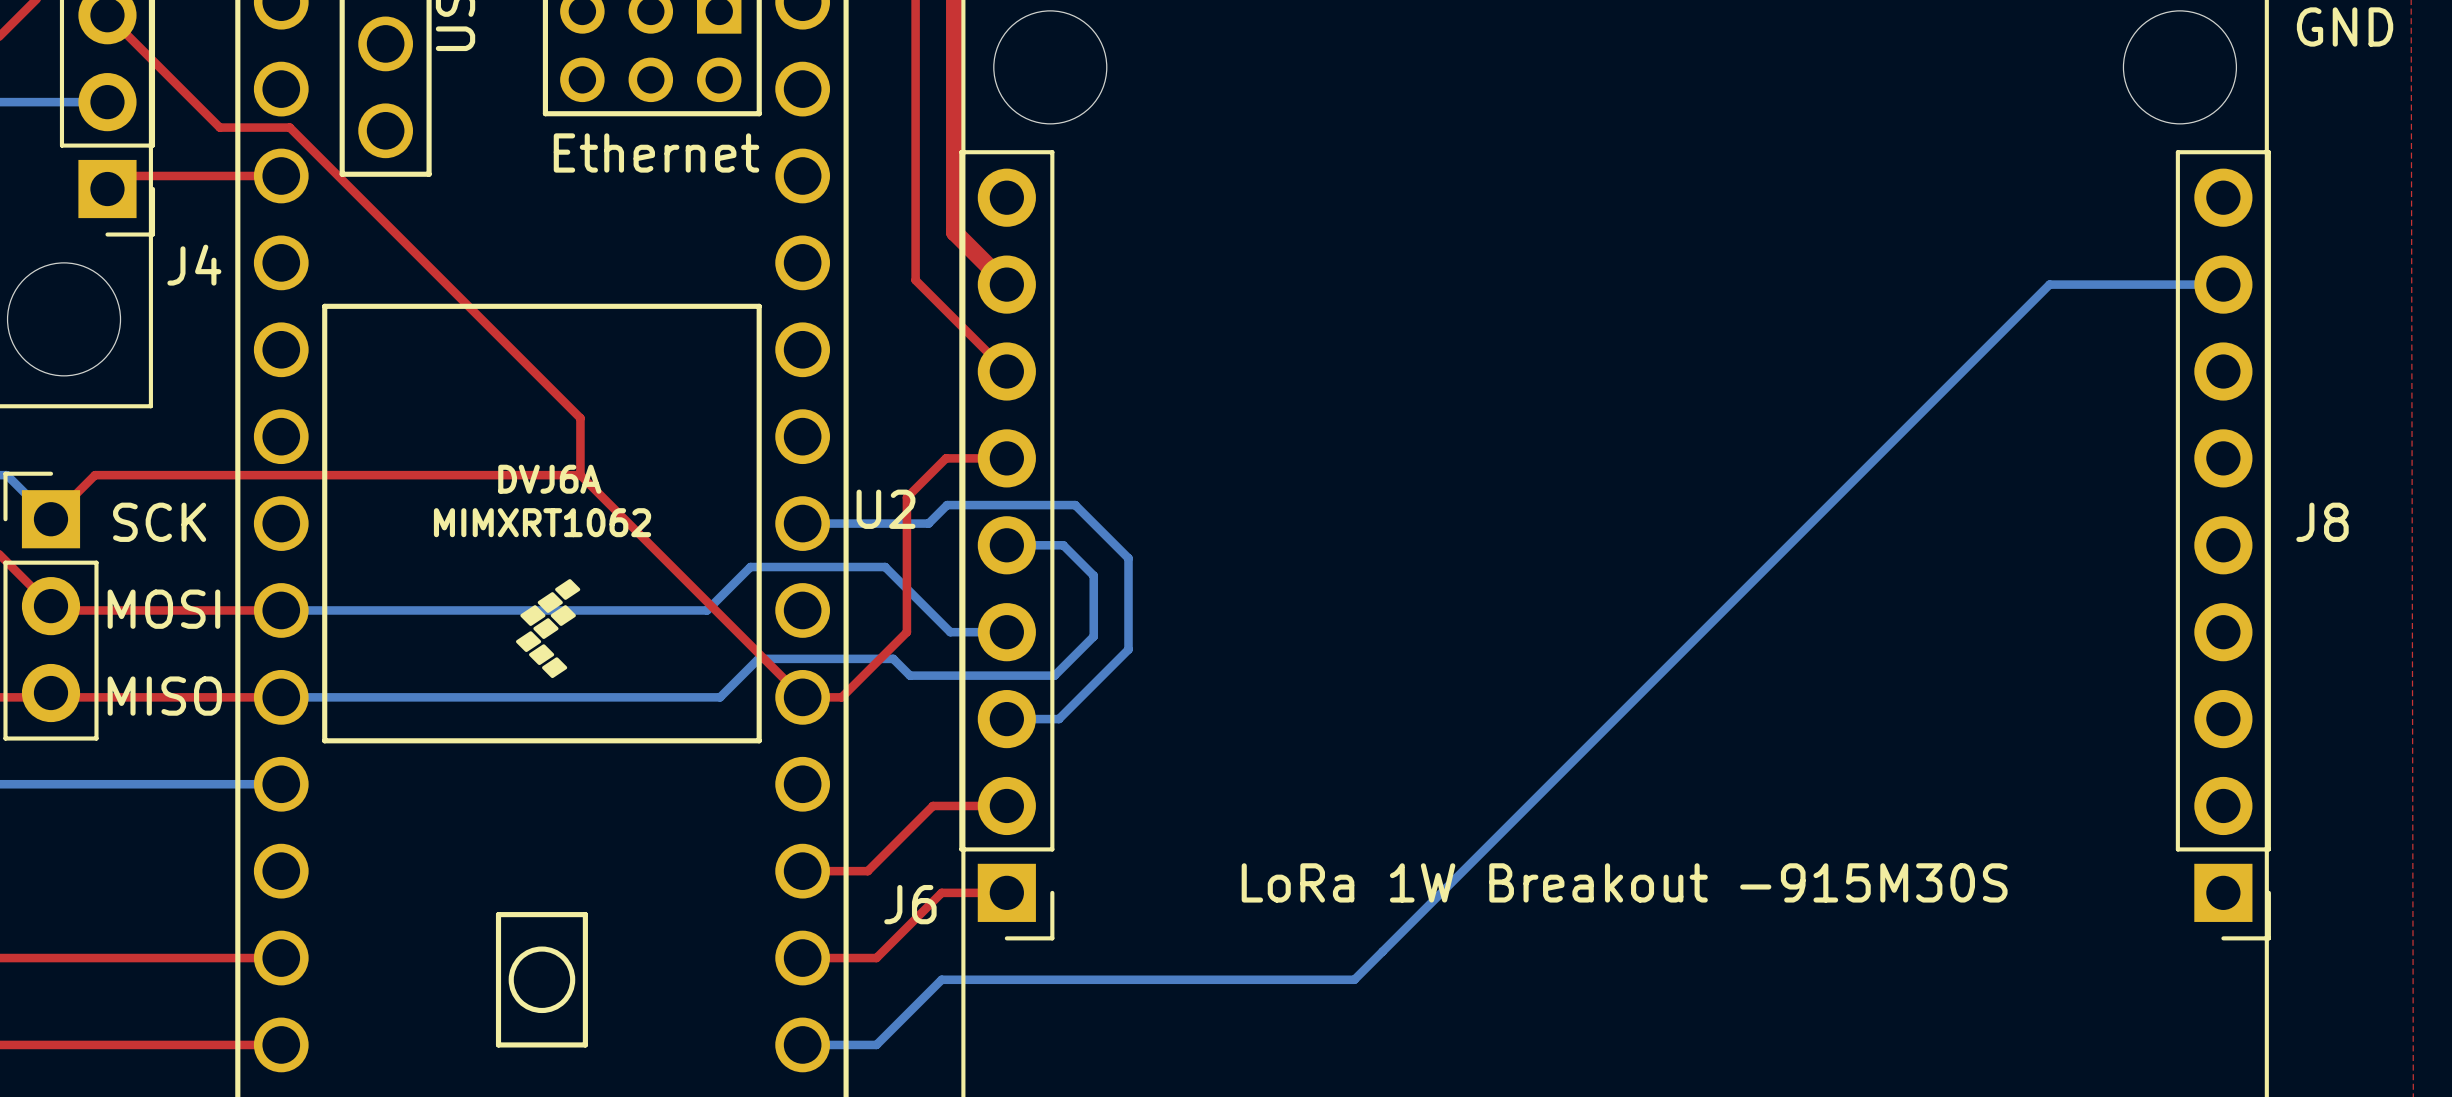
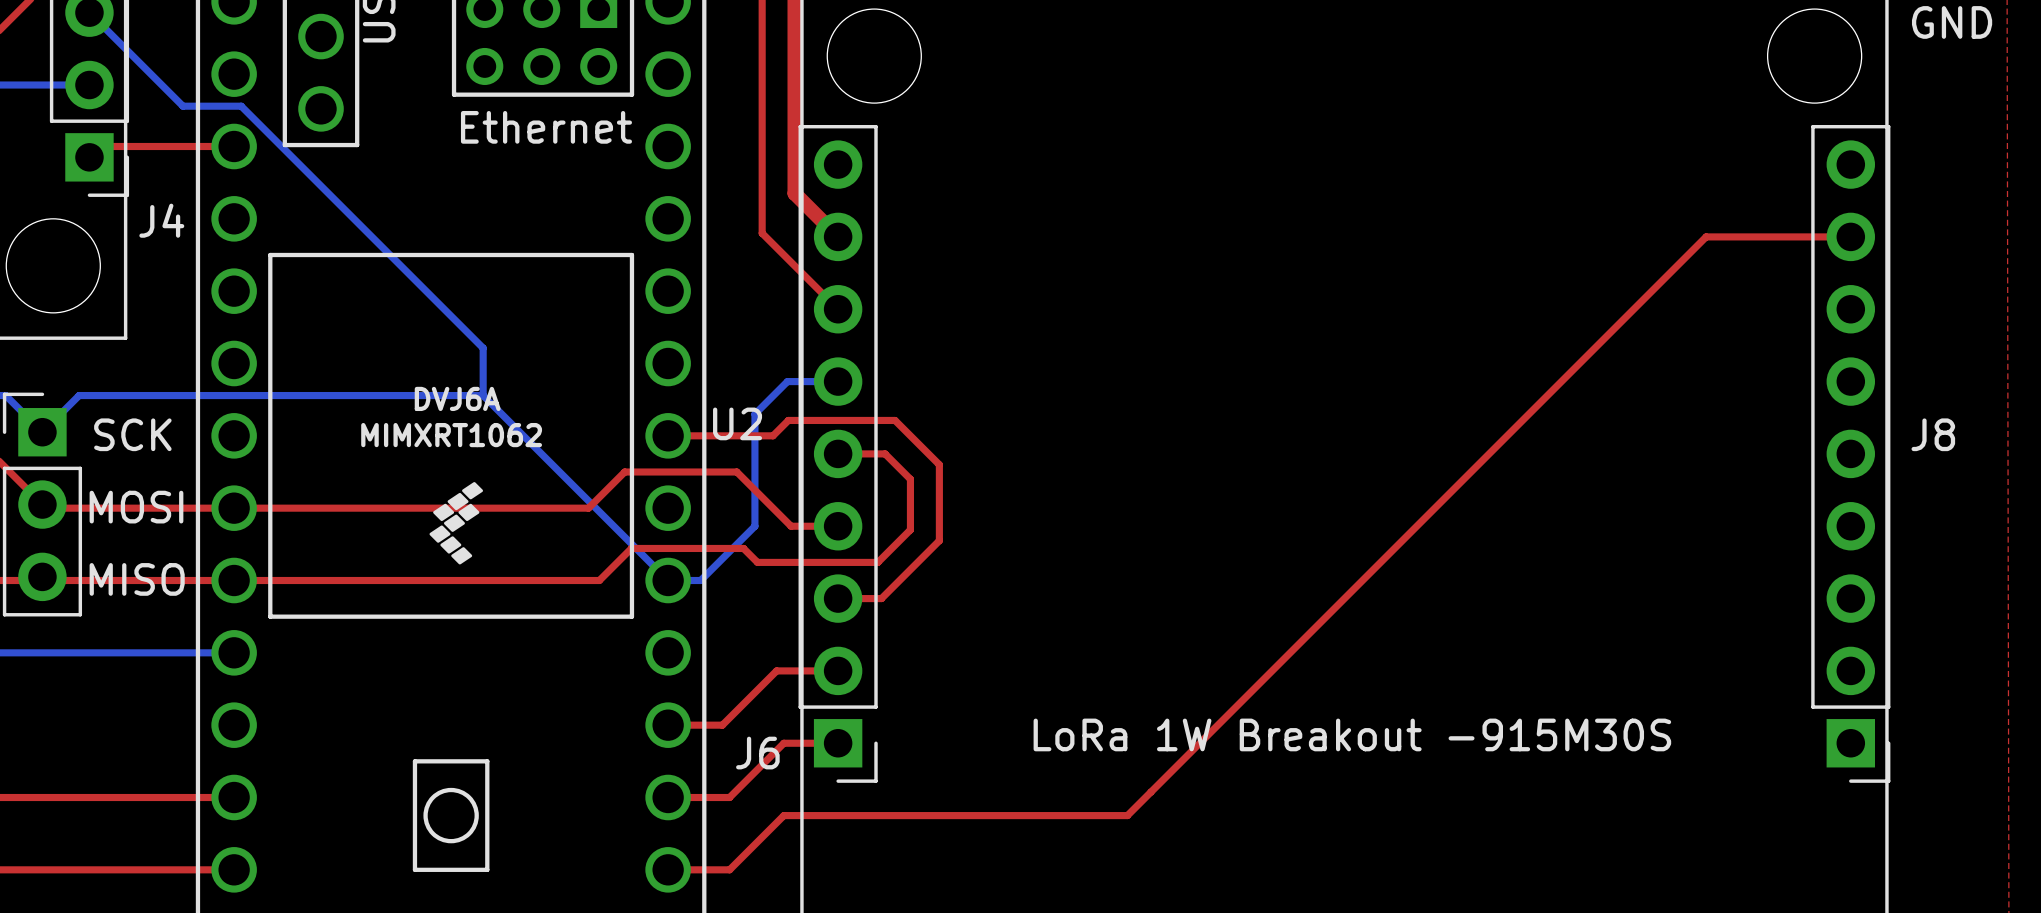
top track: (107, 15) (219, 127) (289, 127) (580, 418) (580, 475) -> none
bottom track: none -> (89, 12) (182, 106) (241, 106) (483, 348) (483, 395)
top track: none -> (1850, 236) (1706, 236) (1127, 815) (783, 815) (729, 869) (668, 869)
bottom track: (2223, 284) (2049, 284) (1354, 979) (941, 979) (876, 1044) (802, 1044) -> none
top track: (1006, 458) (946, 458) (906, 497) (906, 632) (841, 697) (802, 697) (580, 475) -> none
bottom track: none -> (838, 381) (787, 381) (754, 414) (754, 526) (700, 580) (668, 580) (483, 395)
top track: (580, 475) (95, 475) (50, 519) -> none
bottom track: none -> (483, 395) (79, 395) (42, 432)
top track: none -> (668, 435) (773, 435) (788, 420) (895, 420) (939, 464) (939, 540) (881, 598) (838, 598)
bottom track: (802, 523) (928, 523) (947, 505) (1075, 505) (1128, 558) (1128, 649) (1058, 719) (1006, 719) -> none
top track: none -> (838, 453) (885, 453) (910, 479) (910, 529) (877, 562) (757, 562) (743, 548) (631, 548) (599, 580) (234, 580)
bottom track: (1006, 545) (1063, 545) (1093, 575) (1093, 636) (1054, 675) (910, 675) (893, 658) (758, 658) (720, 697) (281, 697) -> none
top track: none -> (234, 508) (588, 508) (624, 472) (736, 472) (791, 526) (838, 526)
bottom track: (281, 610) (707, 610) (750, 567) (885, 567) (950, 632) (1006, 632) -> none

